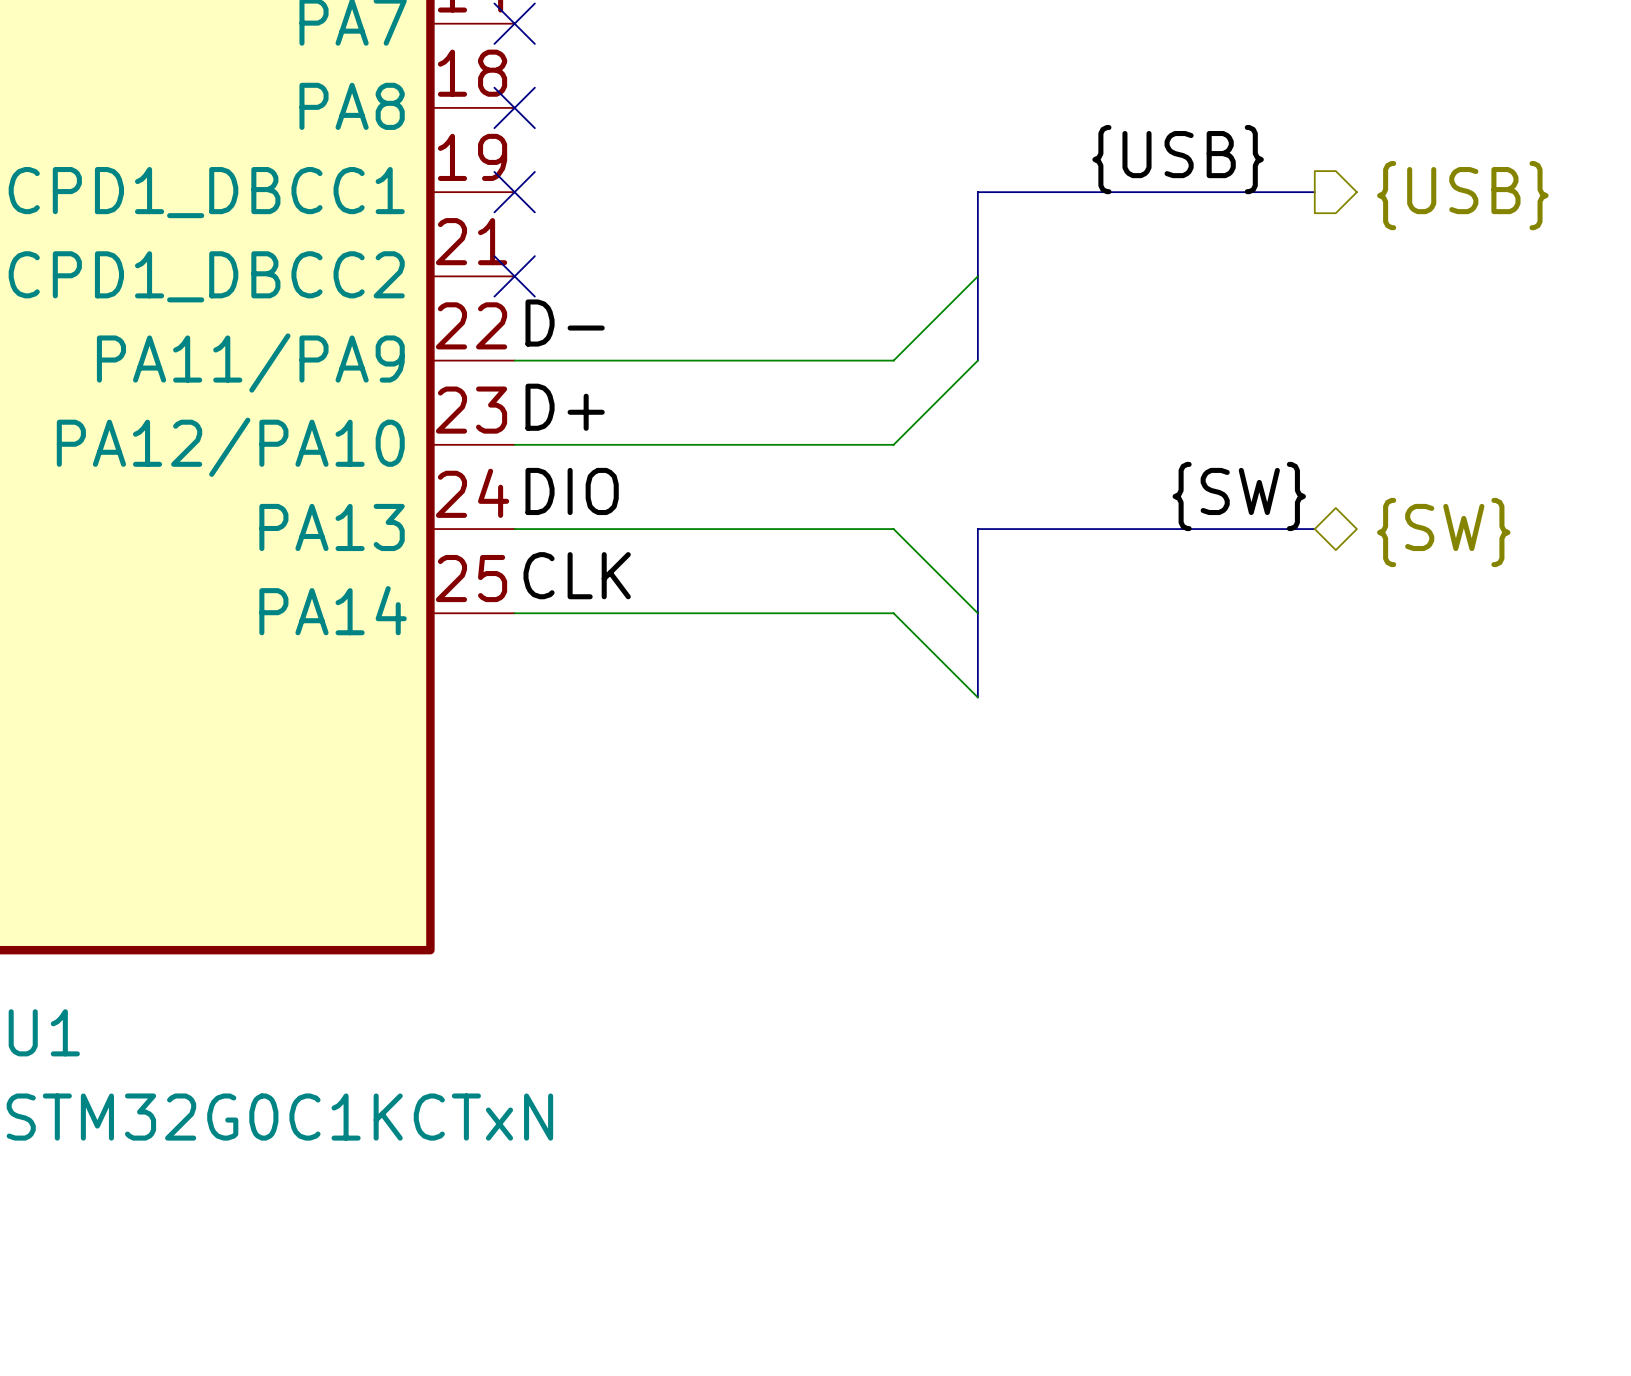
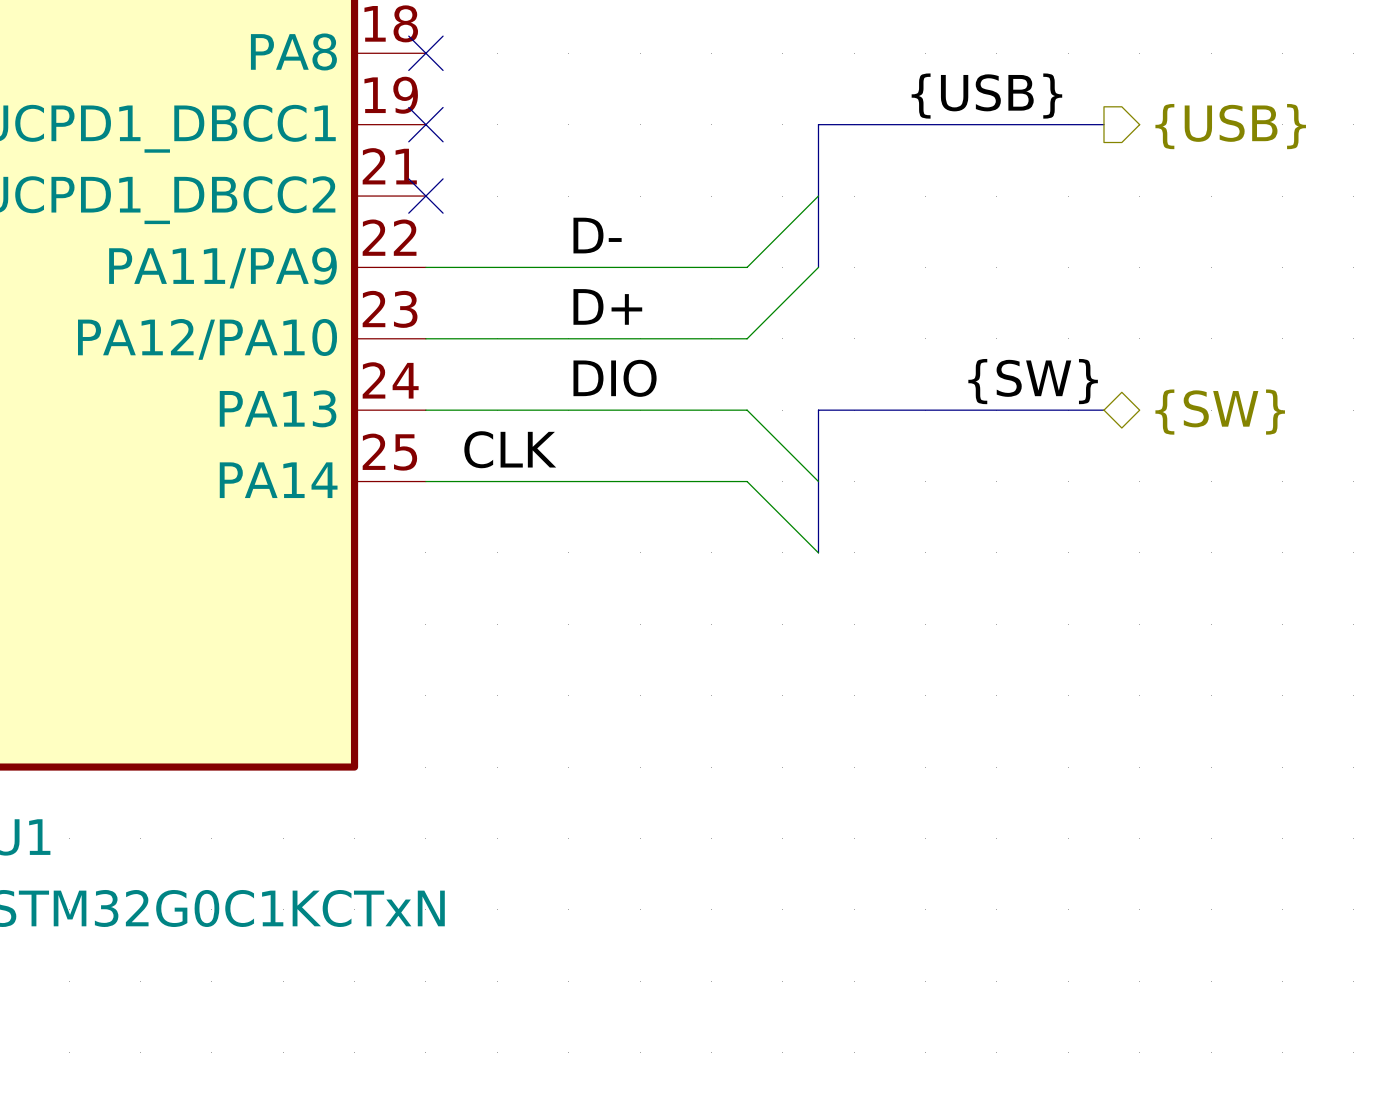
label position: D- (565, 323) -> D- (597, 235)
label position: D+ (565, 407) -> D+ (607, 306)
label position: DIO (572, 491) -> DIO (615, 378)
label position: CLK (577, 575) -> CLK (510, 449)

